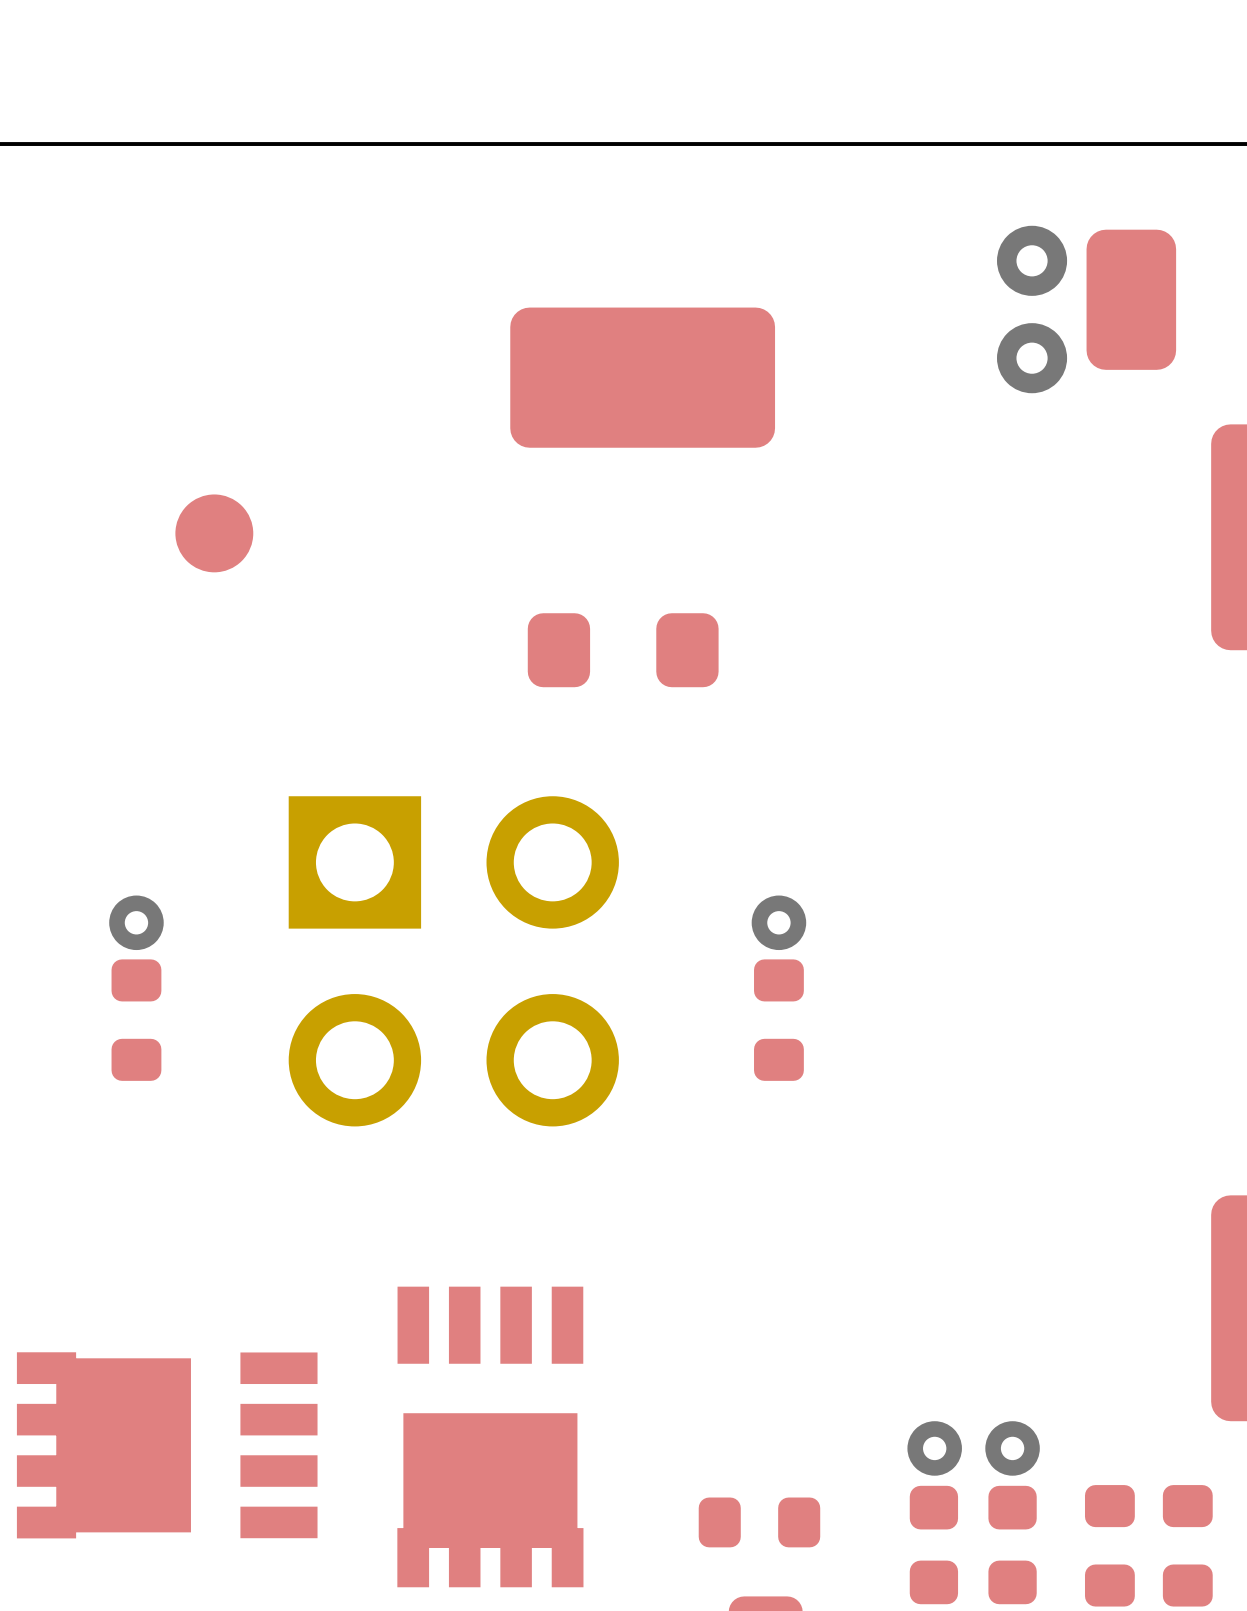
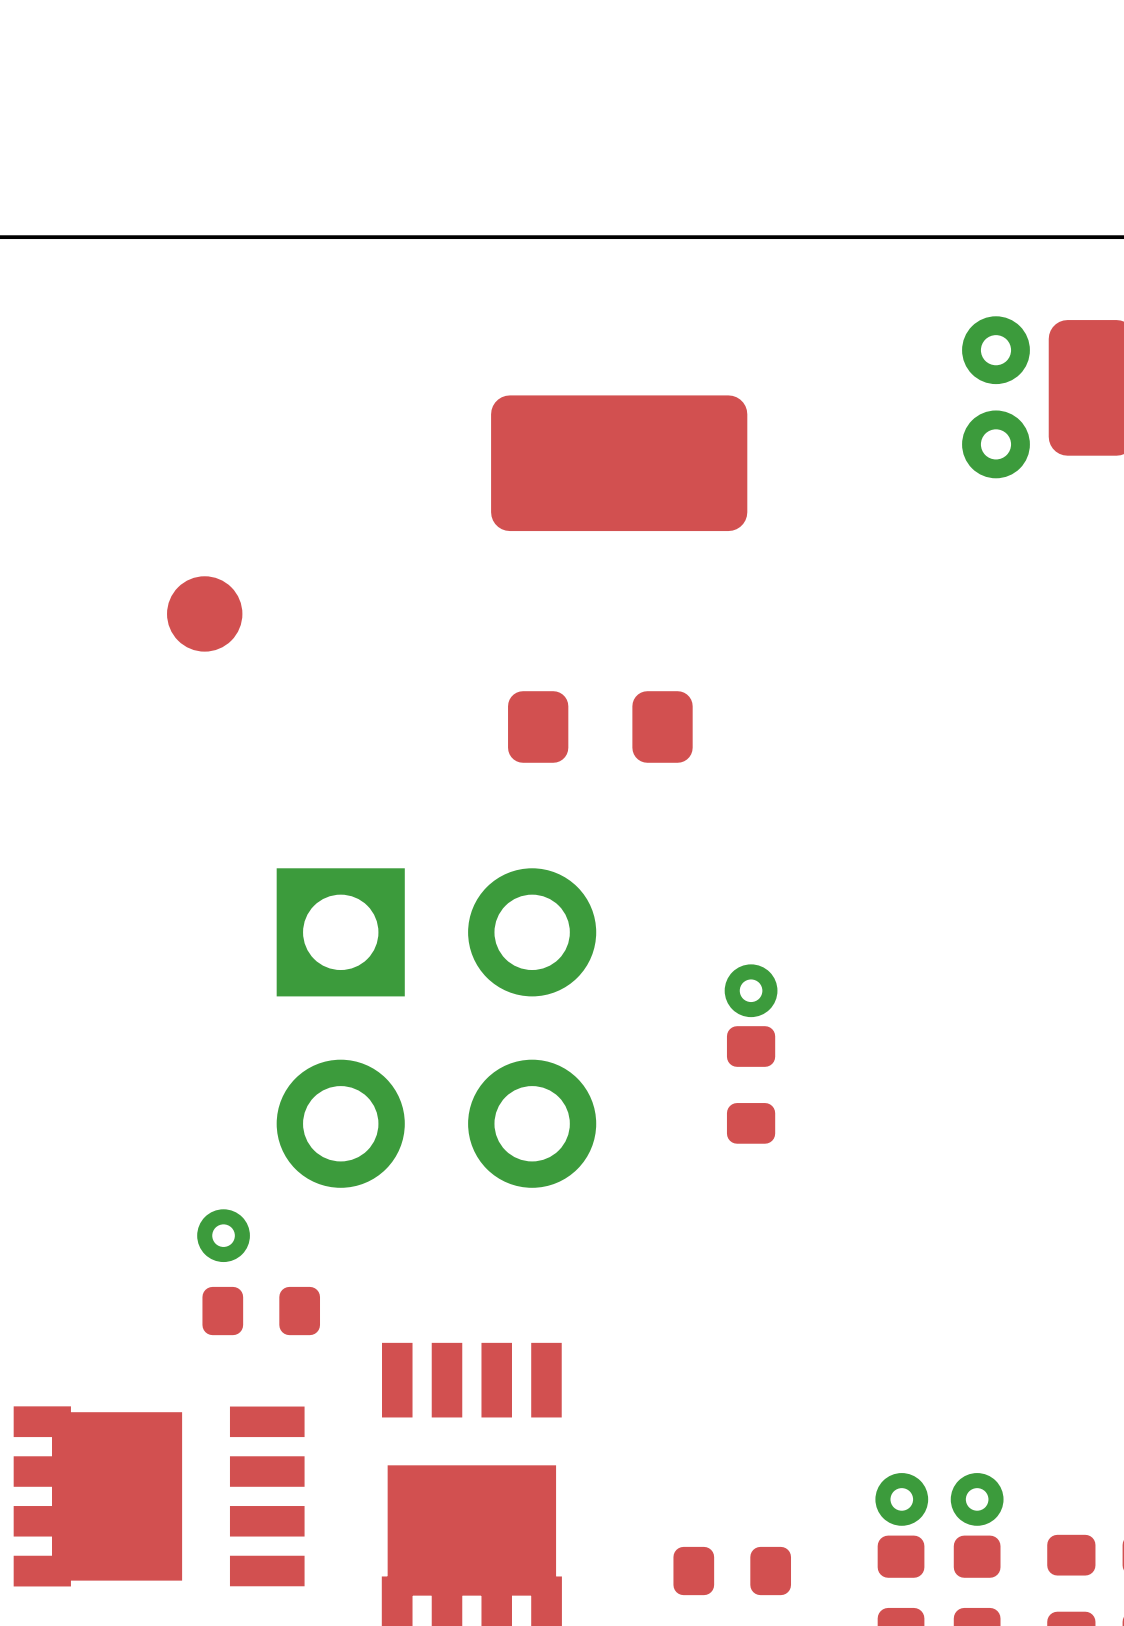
via position: (136, 922) -> (223, 1235)
part rotation: 0° (136, 1020) -> 90° clockwise (261, 1311)
part position: (136, 1020) -> (261, 1311)

